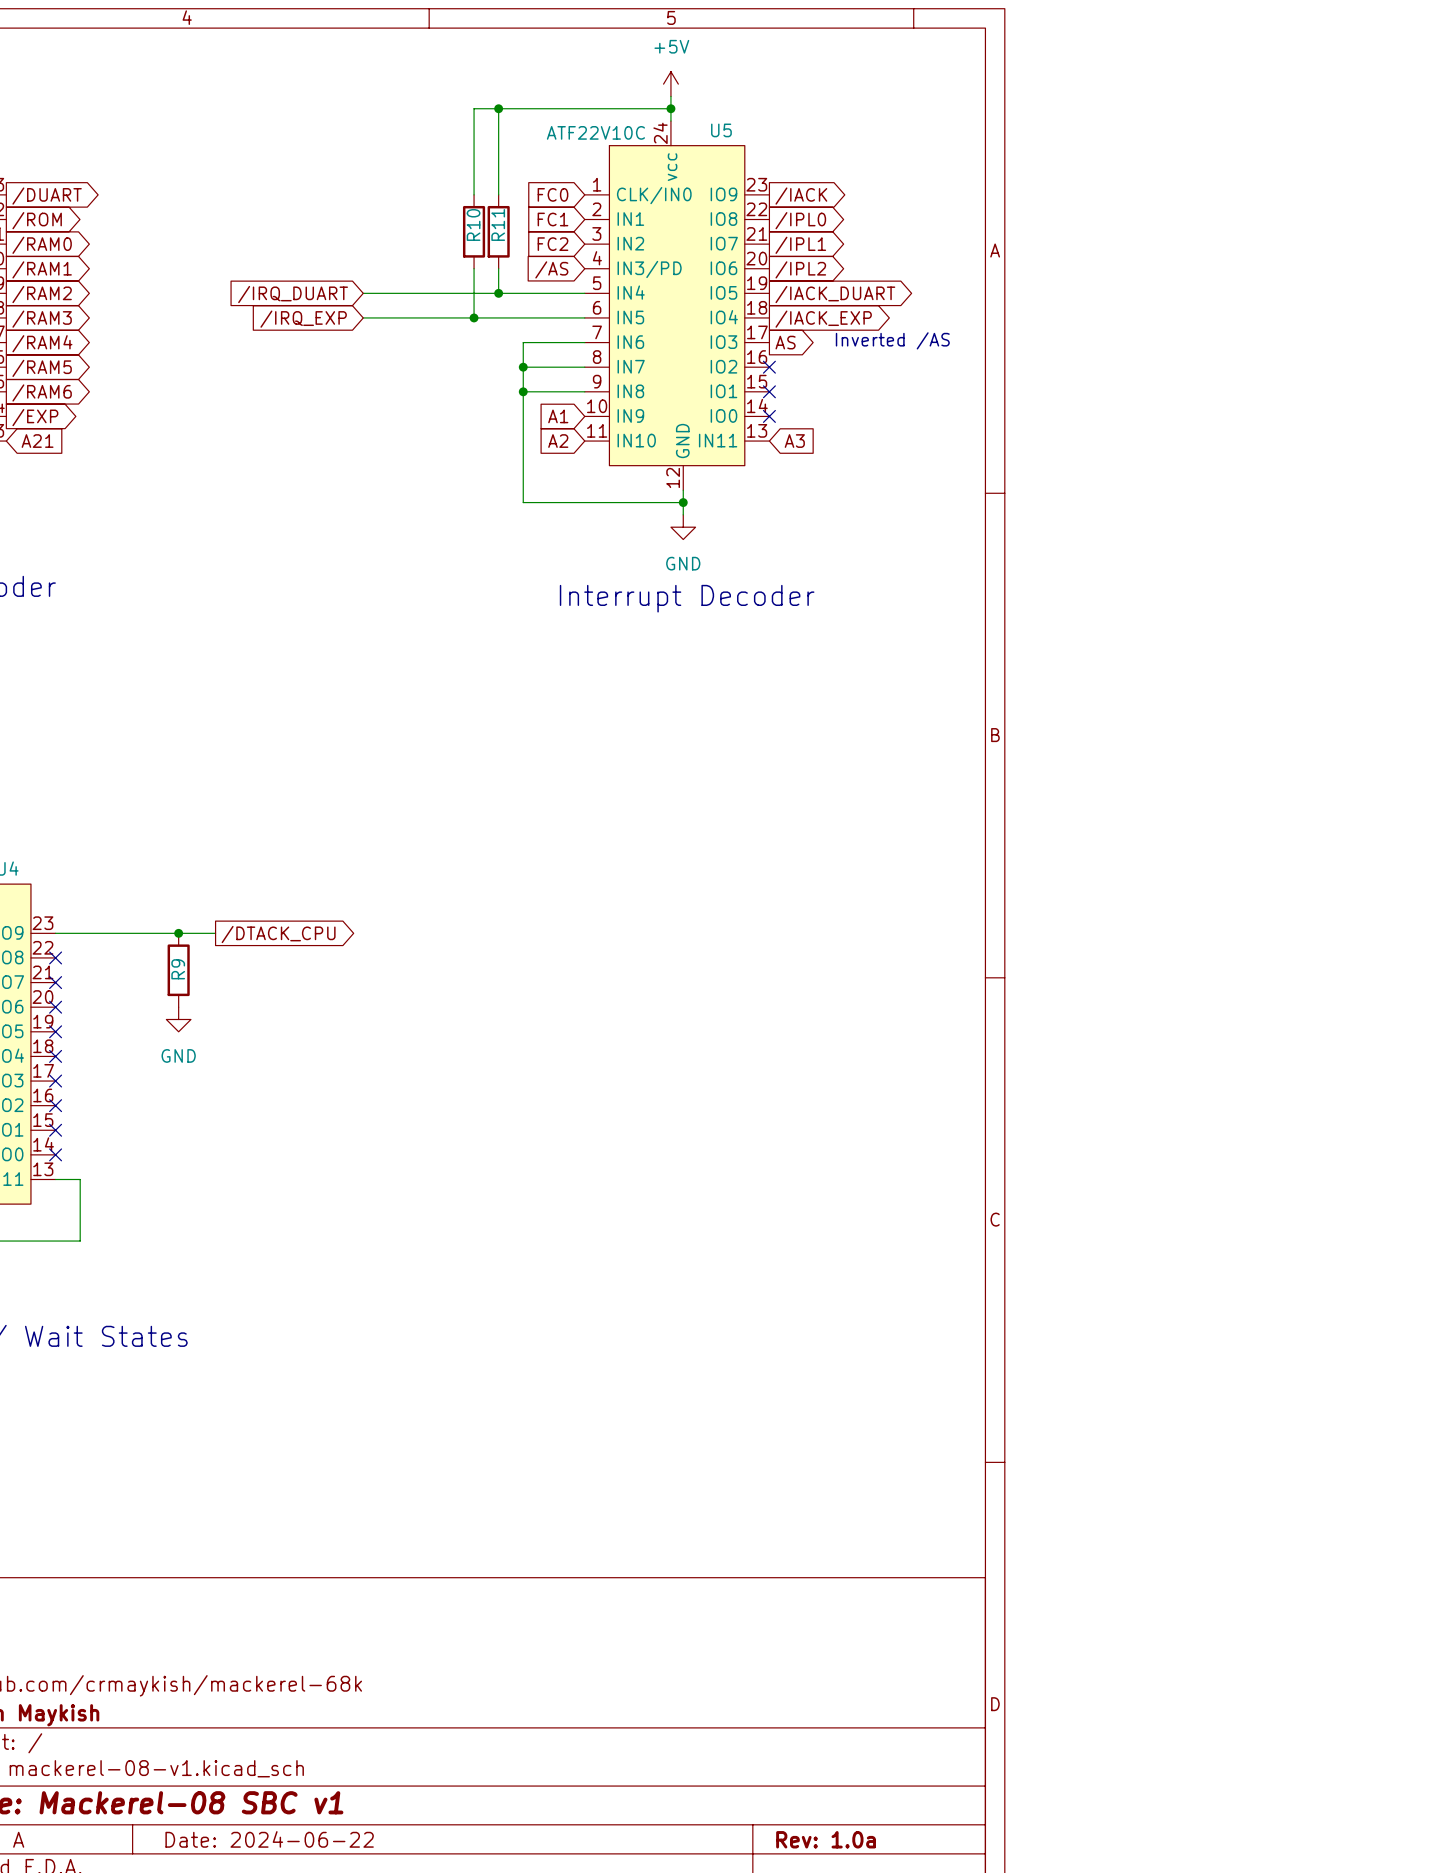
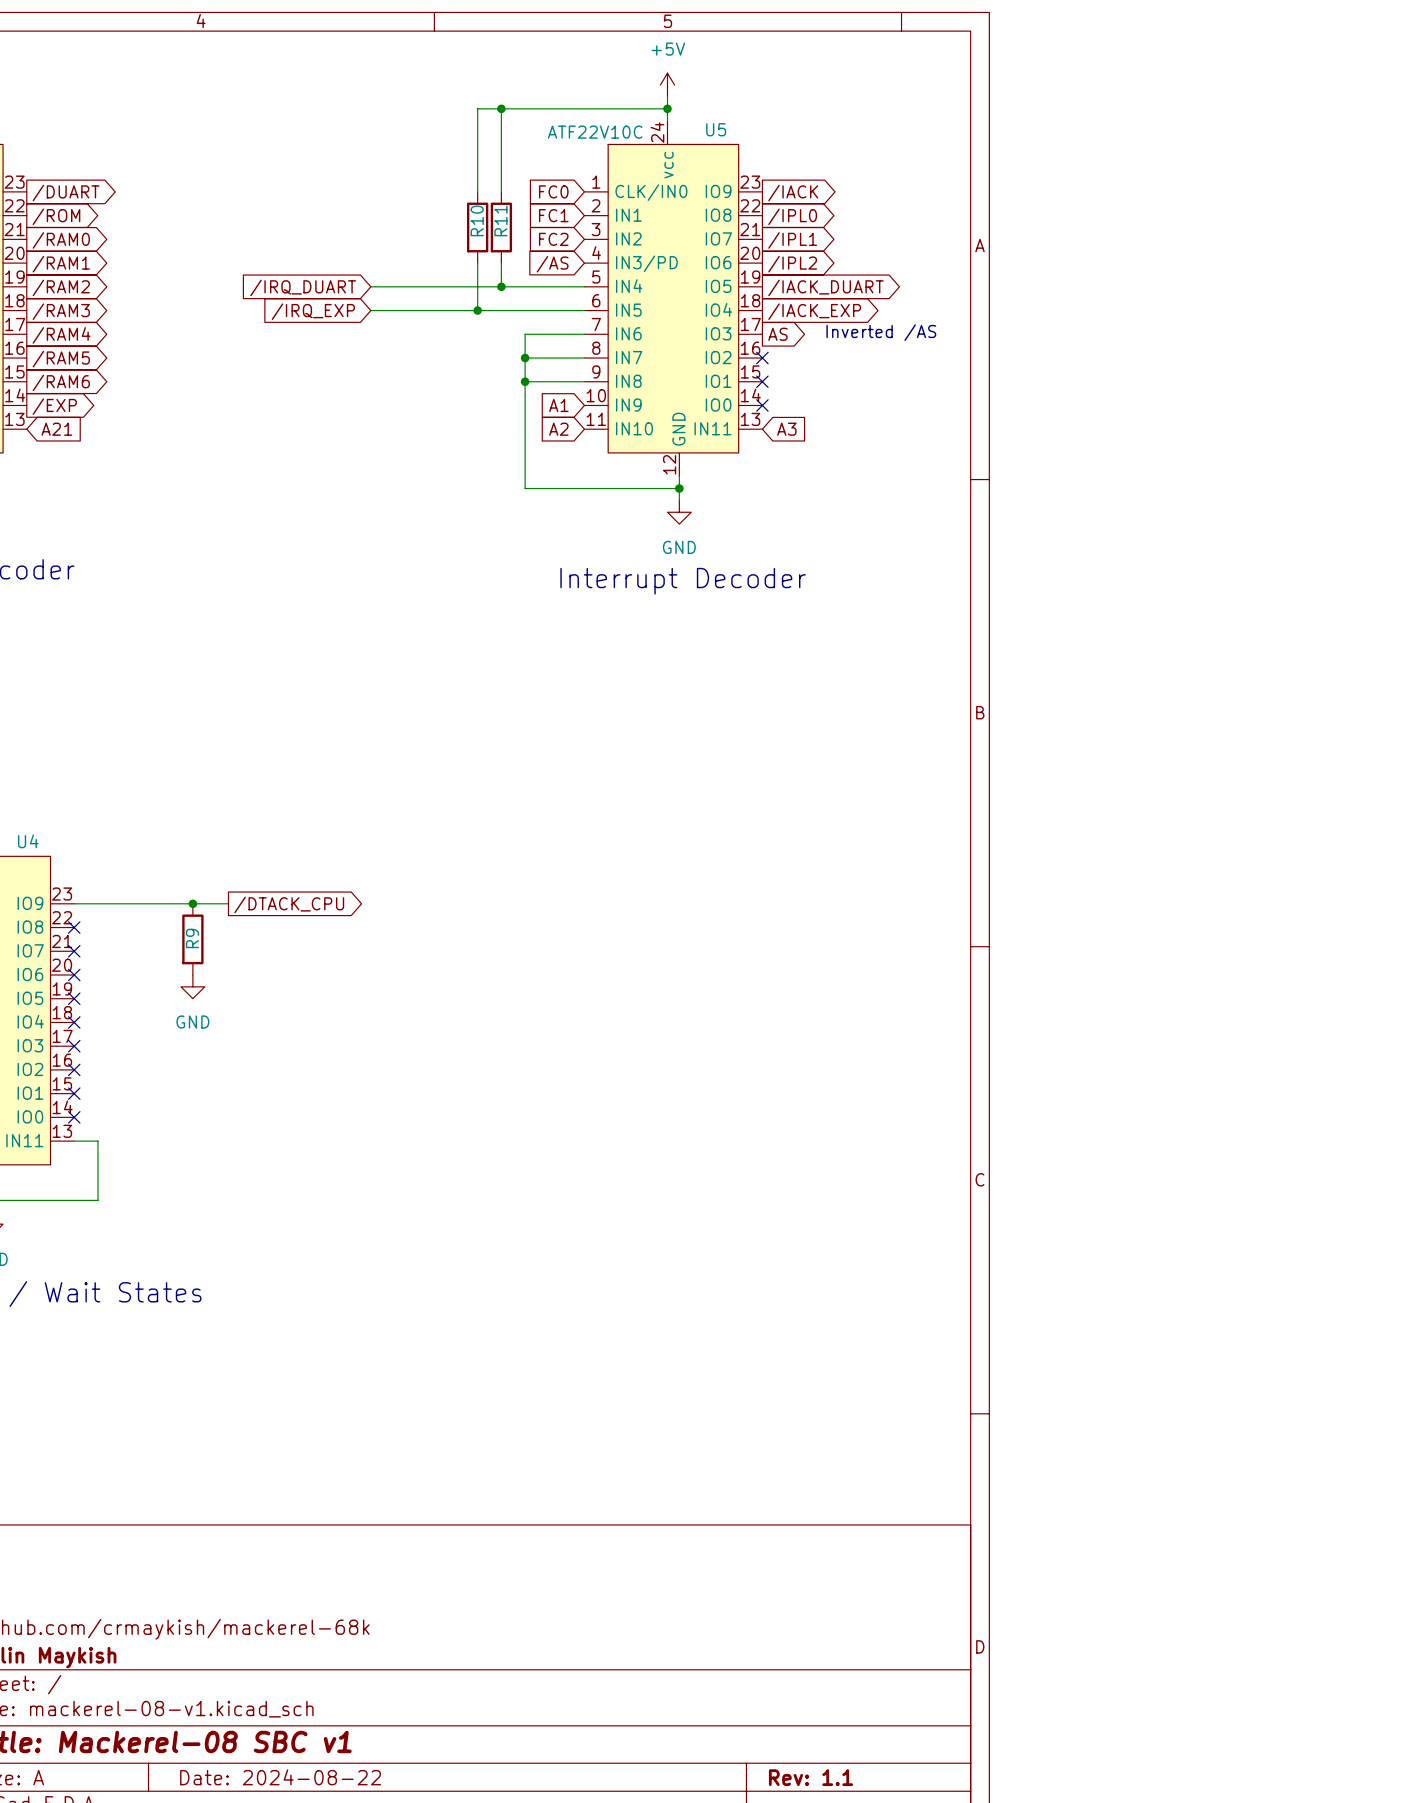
title block: Date: 2024-06-22 (269, 1839) -> Date: 2024-08-22 (280, 1777)
title block: Rev: 1.0a (826, 1839) -> Rev: 1.1 (811, 1777)

